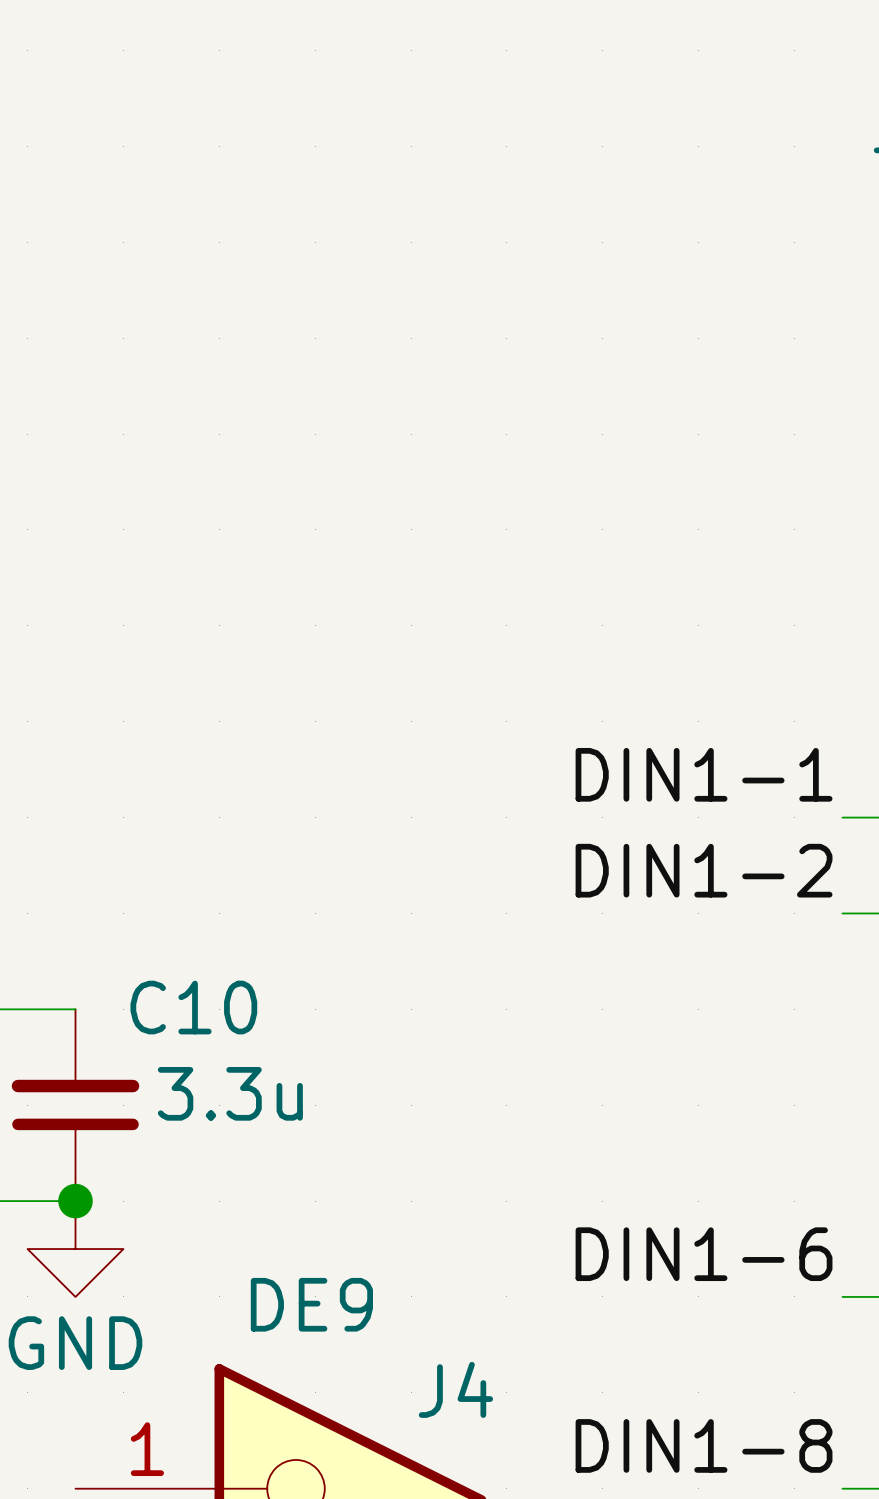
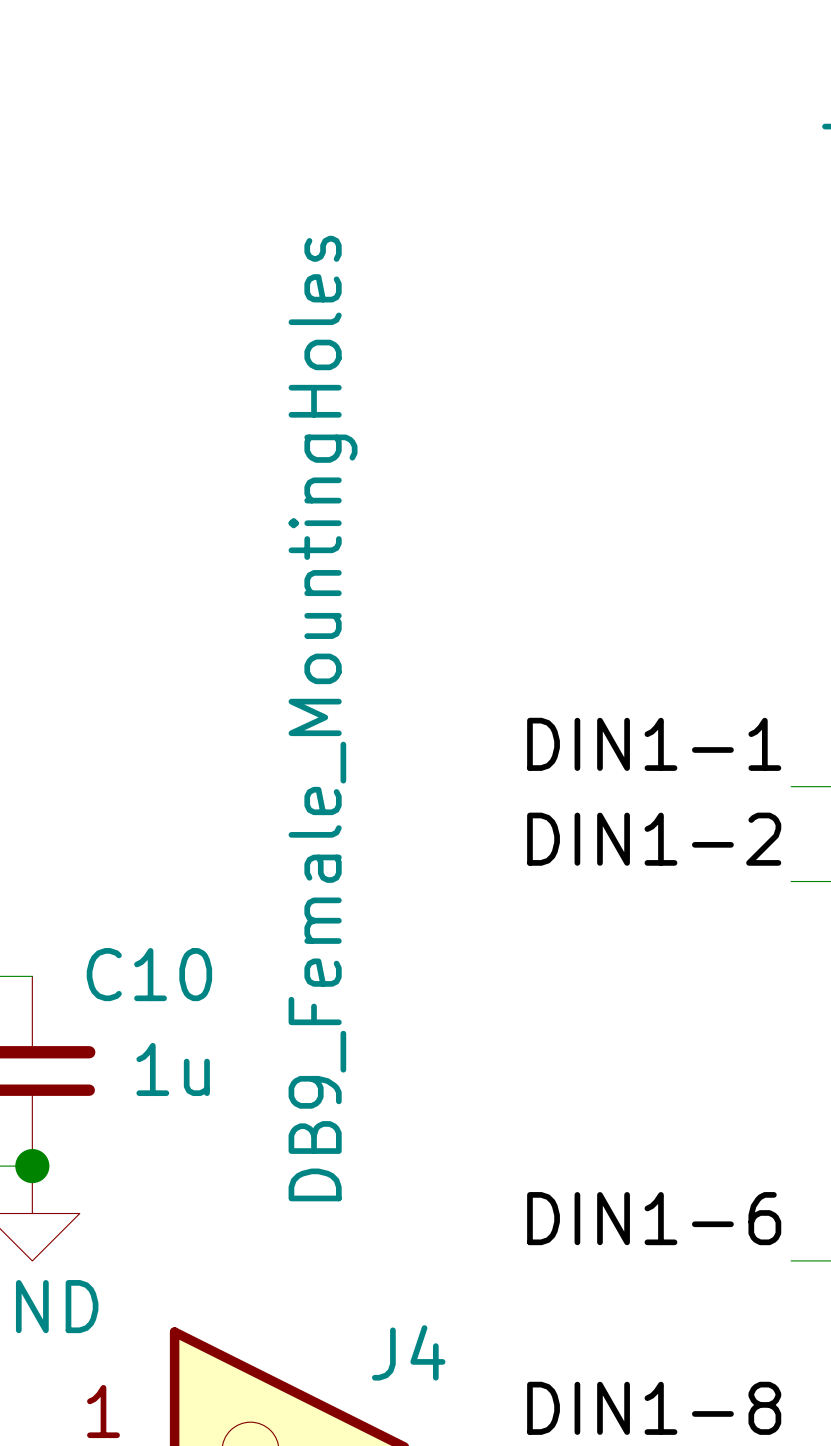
C10 value: 3.3u (230, 1093) -> 1u (173, 1069)
J4 value: DE9 (311, 1304) -> DB9_Female_MountingHoles (323, 718)

